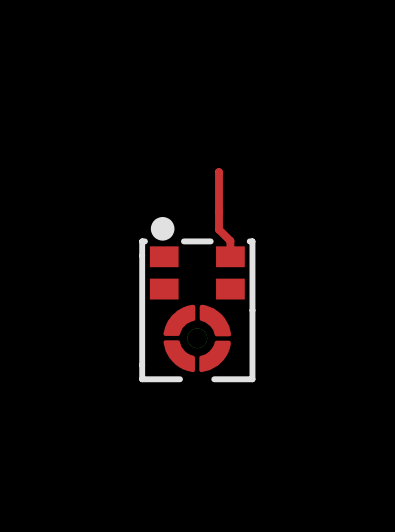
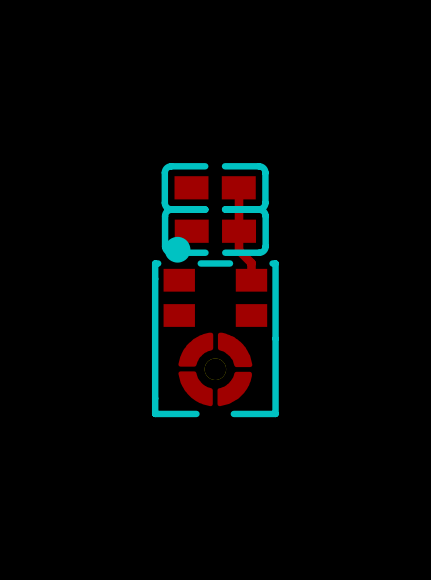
part: none -> (215, 187)
part: none -> (215, 231)

